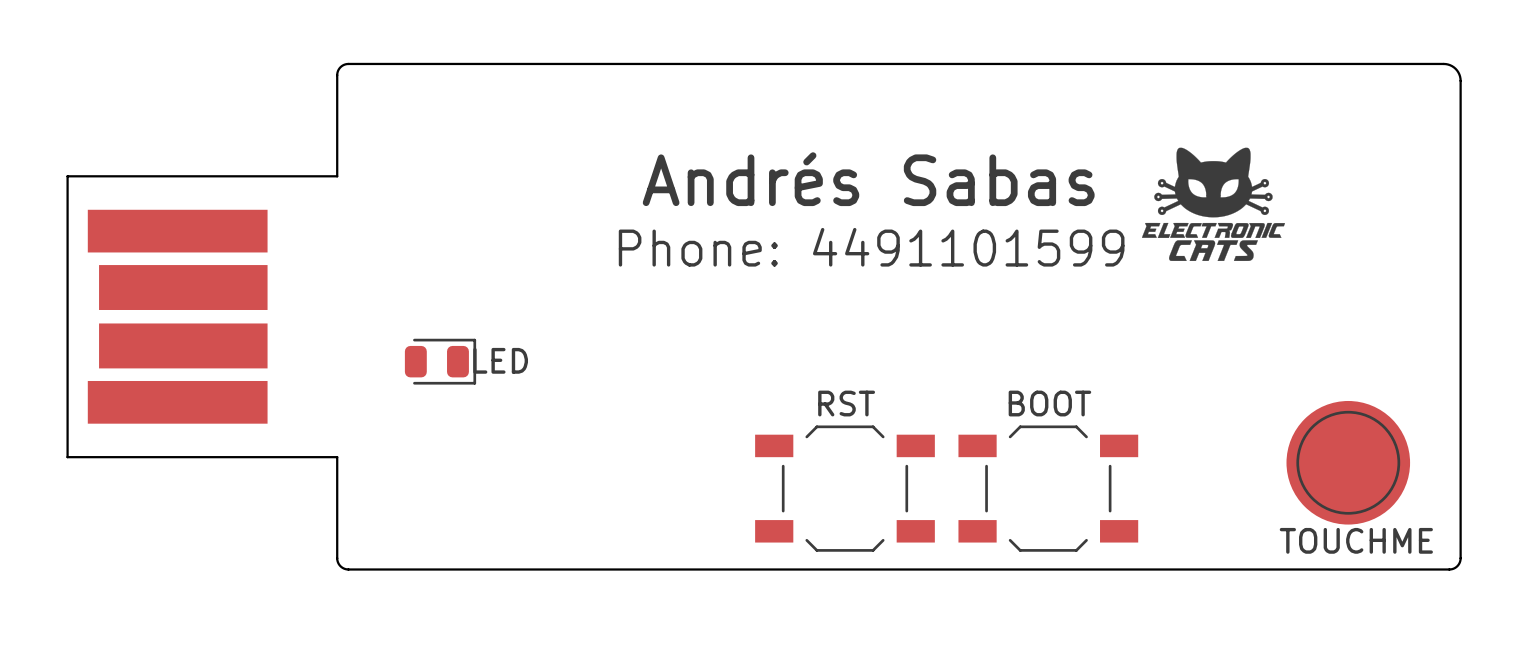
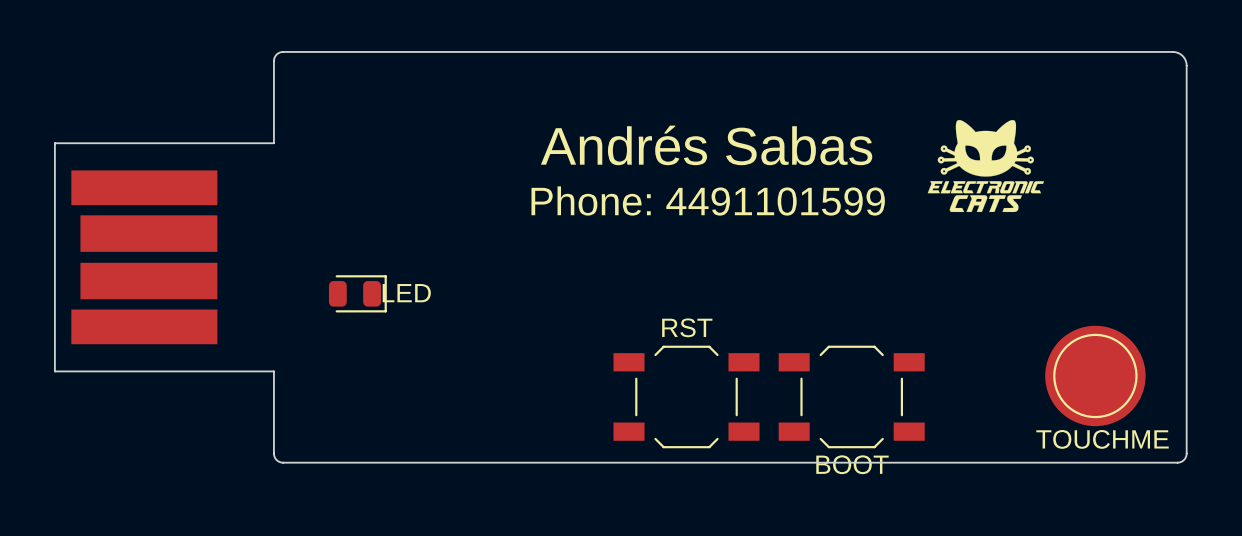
BOOT name position: BOOT (1049, 403) -> BOOT (852, 464)

